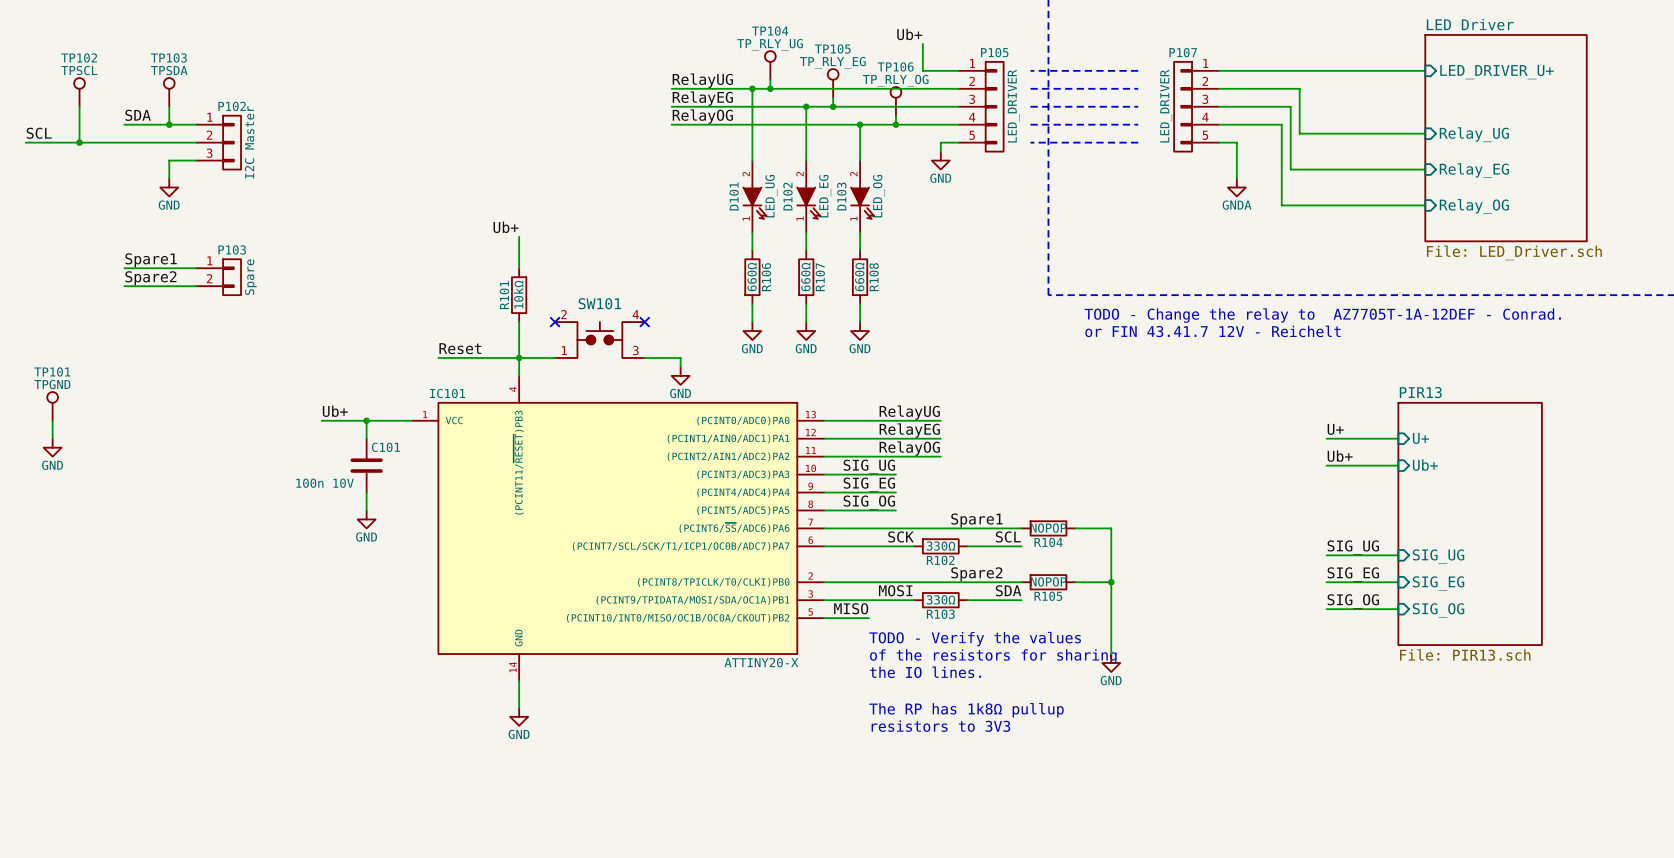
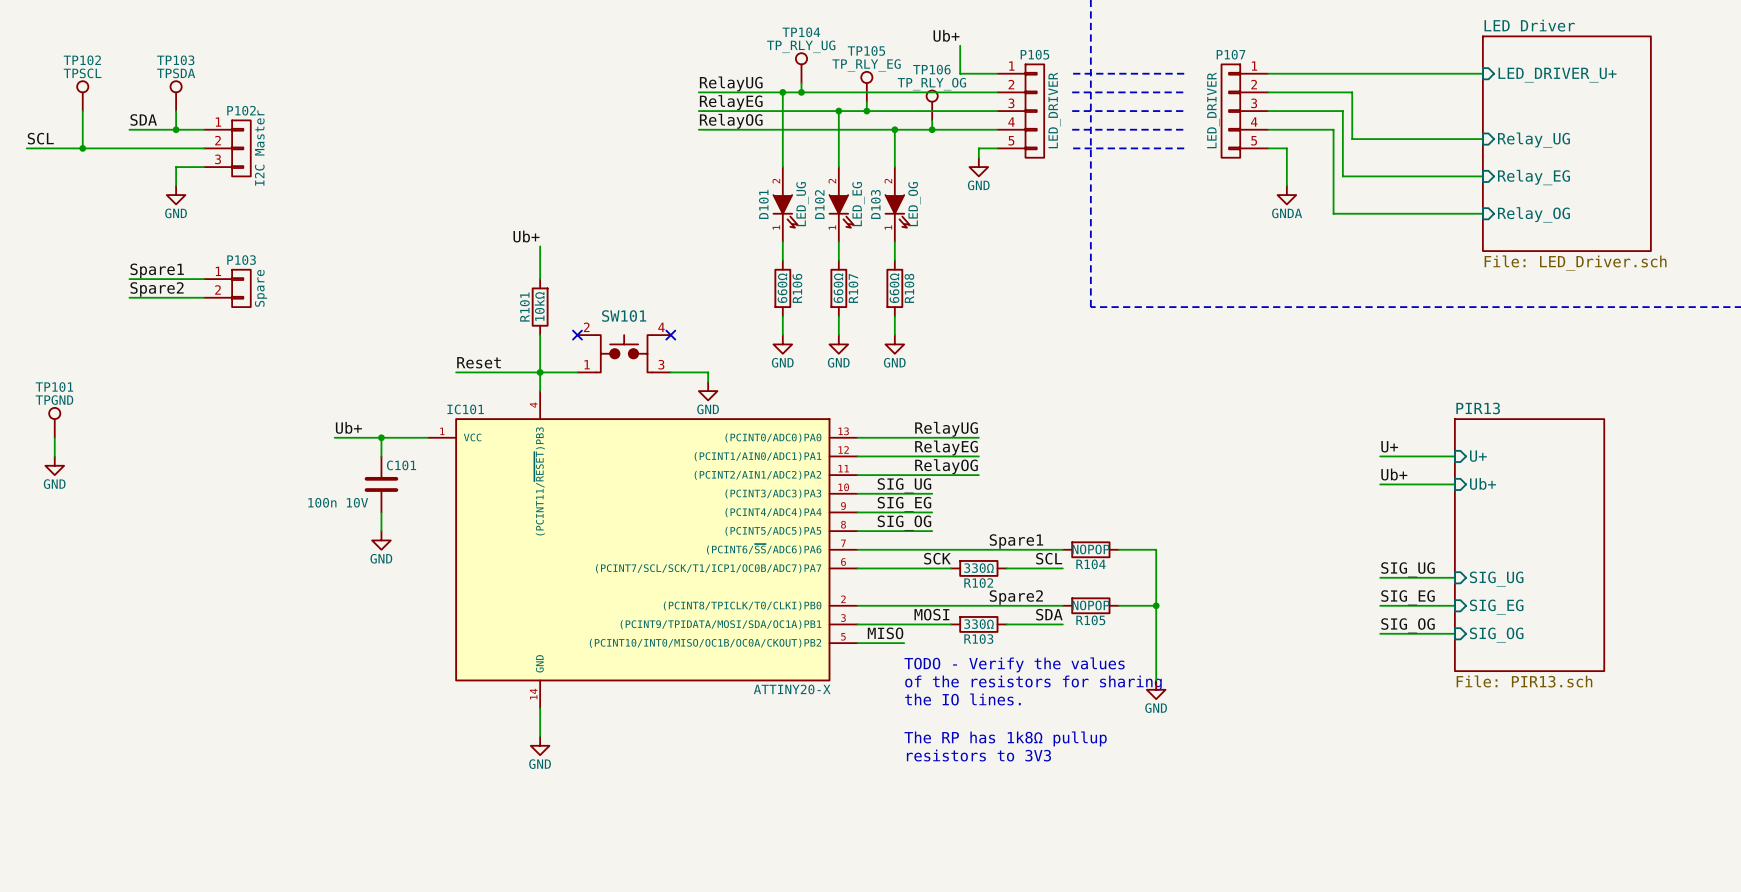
text: TODO - Change the relay to AZ7705T-1A-12DEF - Conrad. (1322, 315) -> none
text: or FIN 43.41.7 12V - Reichelt (1213, 331) -> none

